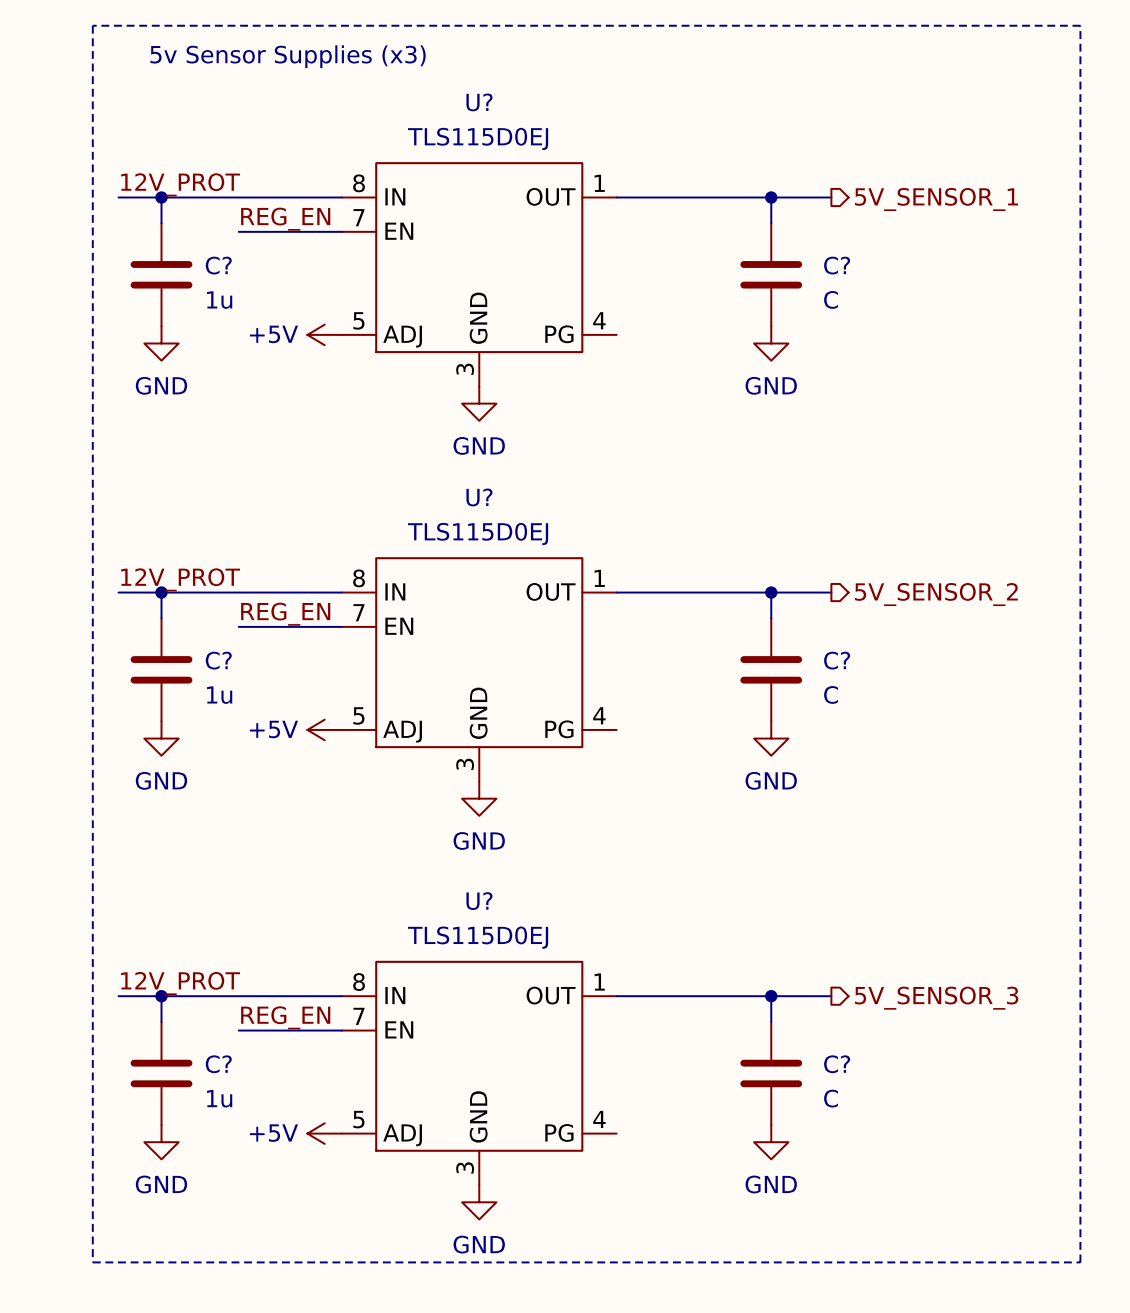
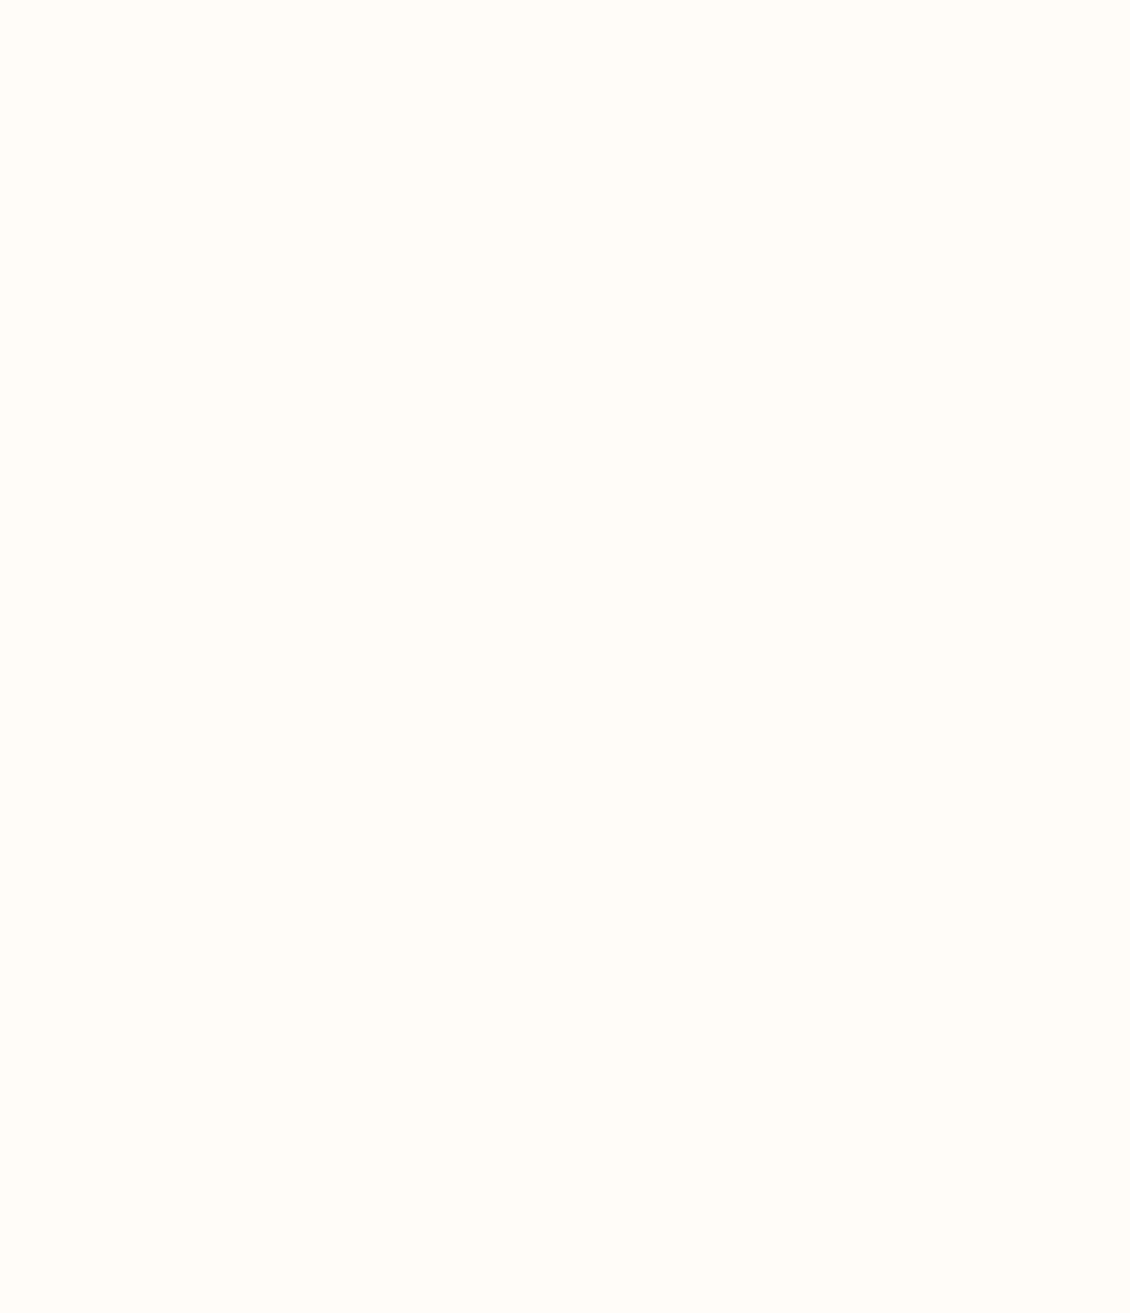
line: (92, 25) (92, 1262) (1080, 1262) (1080, 25) (92, 25) -> none
text: 5v Sensor Supplies (x3) (288, 56) -> none
label: 12V_PROT (180, 184) -> none
wire: (118, 197) (341, 197) -> none
wire: (161, 197) (161, 223) -> none
junction: (161, 197) -> none
wire: (616, 197) (831, 197) -> none
wire: (771, 197) (771, 223) -> none
junction: (771, 197) -> none
hierarchical label: 5V_SENSOR_1 (936, 199) -> none
label: REG_EN (285, 219) -> none
wire: (238, 231) (341, 231) -> none
C?: 1u (161, 274) -> none
U?: TLS115D0EJ (479, 274) -> none
C?: C (771, 274) -> none
power symbol: +5V (324, 334) -> none
power symbol: GND (161, 343) -> none
power symbol: GND (771, 343) -> none
power symbol: GND (479, 403) -> none
label: 12V_PROT (180, 579) -> none
wire: (118, 592) (341, 592) -> none
wire: (161, 592) (161, 618) -> none
junction: (161, 592) -> none
wire: (616, 592) (831, 592) -> none
wire: (771, 592) (771, 618) -> none
junction: (771, 592) -> none
hierarchical label: 5V_SENSOR_2 (936, 594) -> none
label: REG_EN (285, 614) -> none
wire: (238, 626) (341, 626) -> none
C?: 1u (161, 669) -> none
U?: TLS115D0EJ (479, 669) -> none
C?: C (771, 669) -> none
power symbol: +5V (324, 729) -> none
power symbol: GND (161, 738) -> none
power symbol: GND (771, 738) -> none
power symbol: GND (479, 798) -> none
label: 12V_PROT (180, 983) -> none
wire: (118, 996) (341, 996) -> none
wire: (161, 996) (161, 1021) -> none
junction: (161, 996) -> none
wire: (616, 996) (831, 996) -> none
wire: (771, 996) (771, 1021) -> none
junction: (771, 996) -> none
hierarchical label: 5V_SENSOR_3 (936, 998) -> none
label: REG_EN (285, 1017) -> none
wire: (238, 1030) (341, 1030) -> none
U?: TLS115D0EJ (479, 1072) -> none
C?: 1u (161, 1073) -> none
C?: C (771, 1073) -> none
power symbol: +5V (324, 1133) -> none
power symbol: GND (161, 1142) -> none
power symbol: GND (771, 1142) -> none
power symbol: GND (479, 1202) -> none

